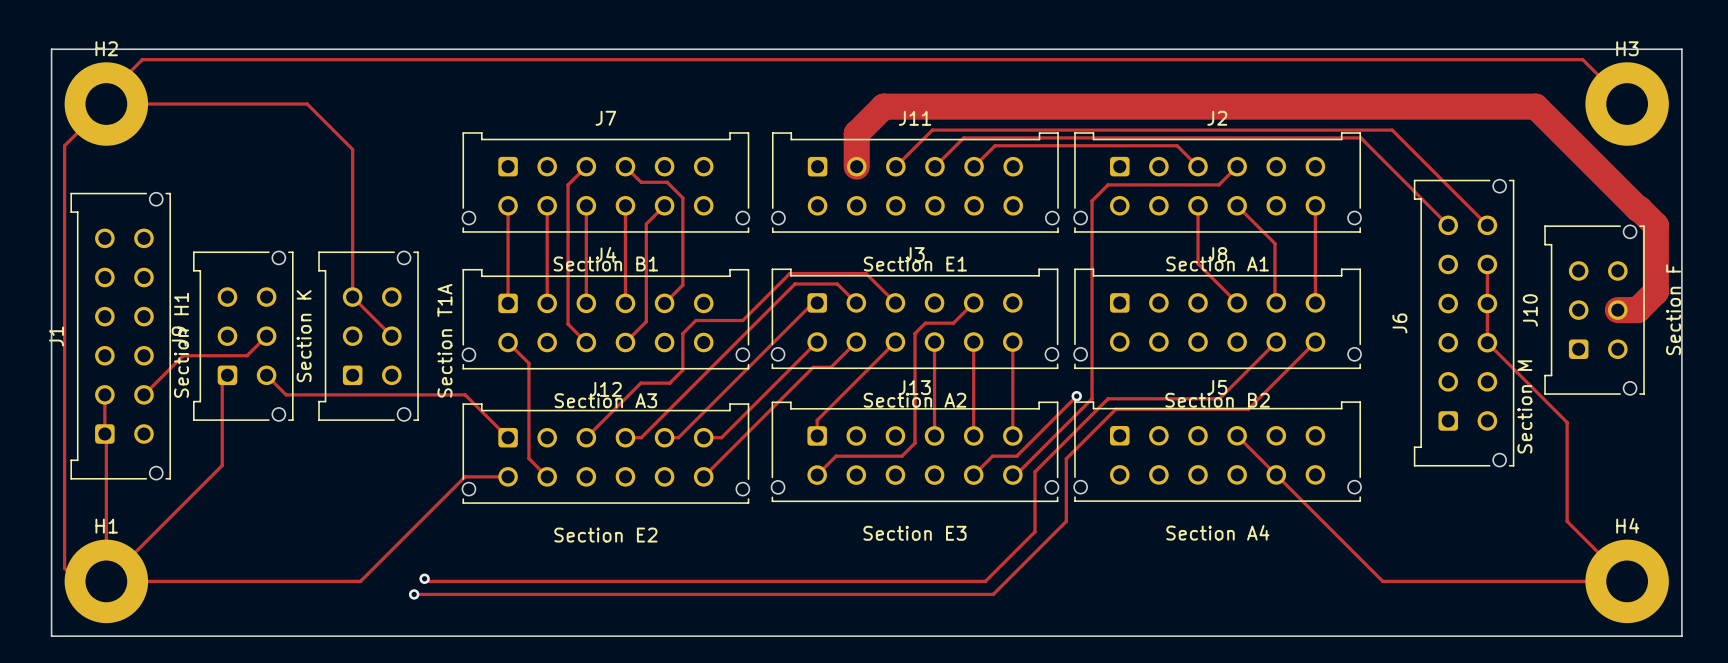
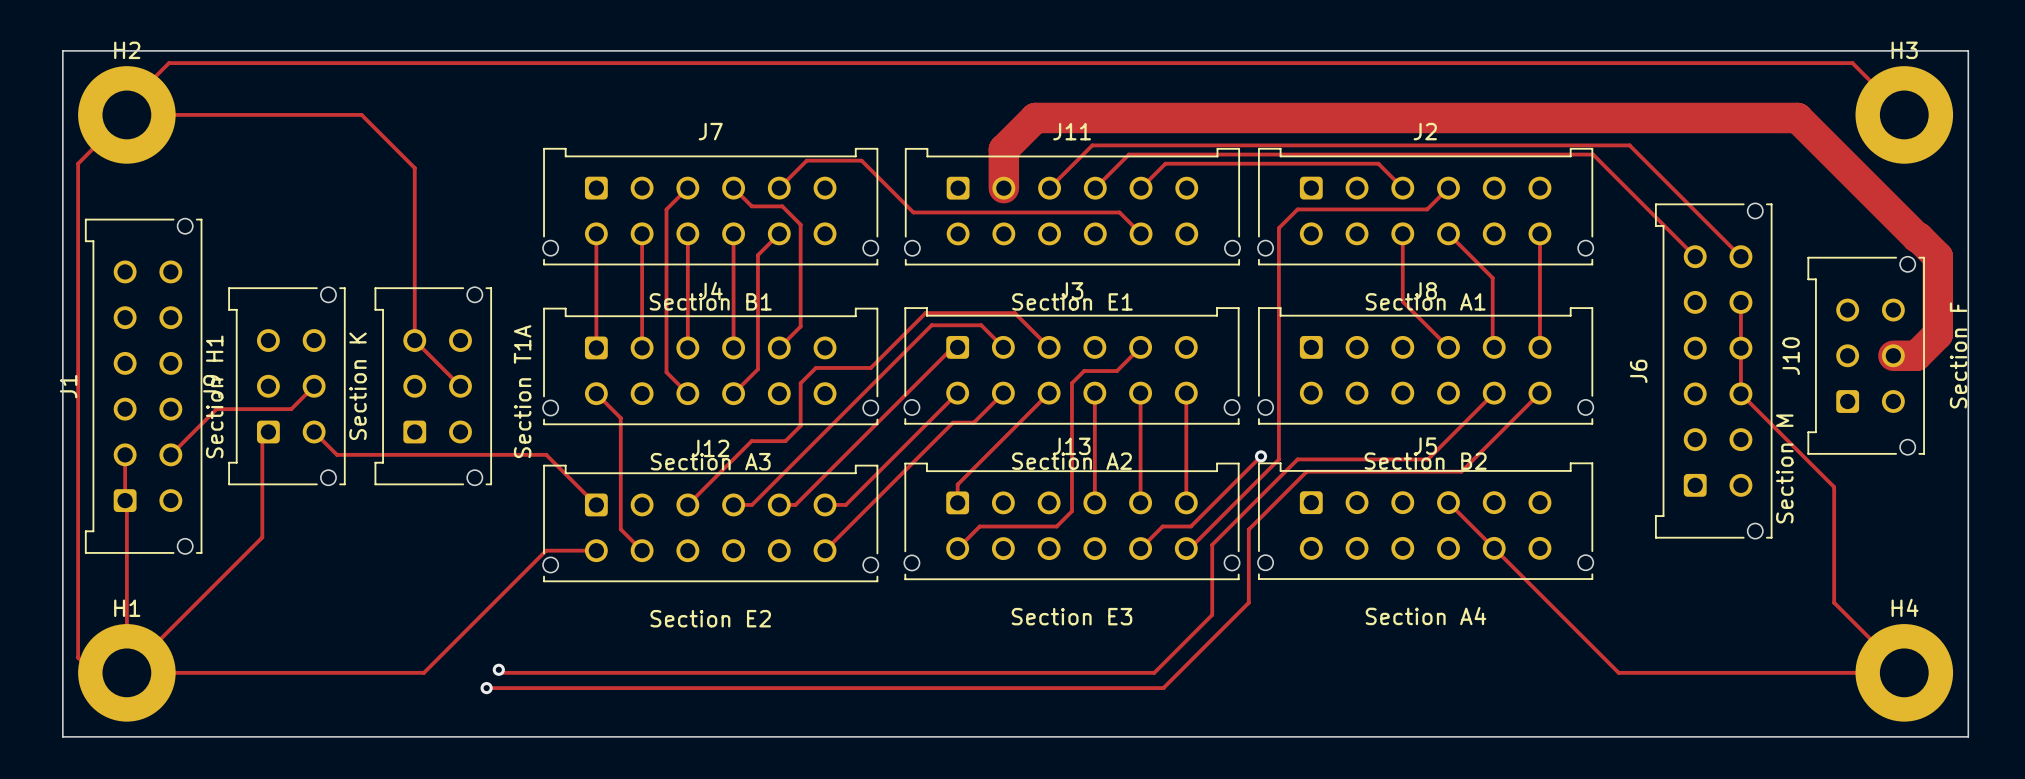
track: none -> (779, 188) (806, 160) (861, 160) (913, 212) (1119, 212) (1141, 233)

